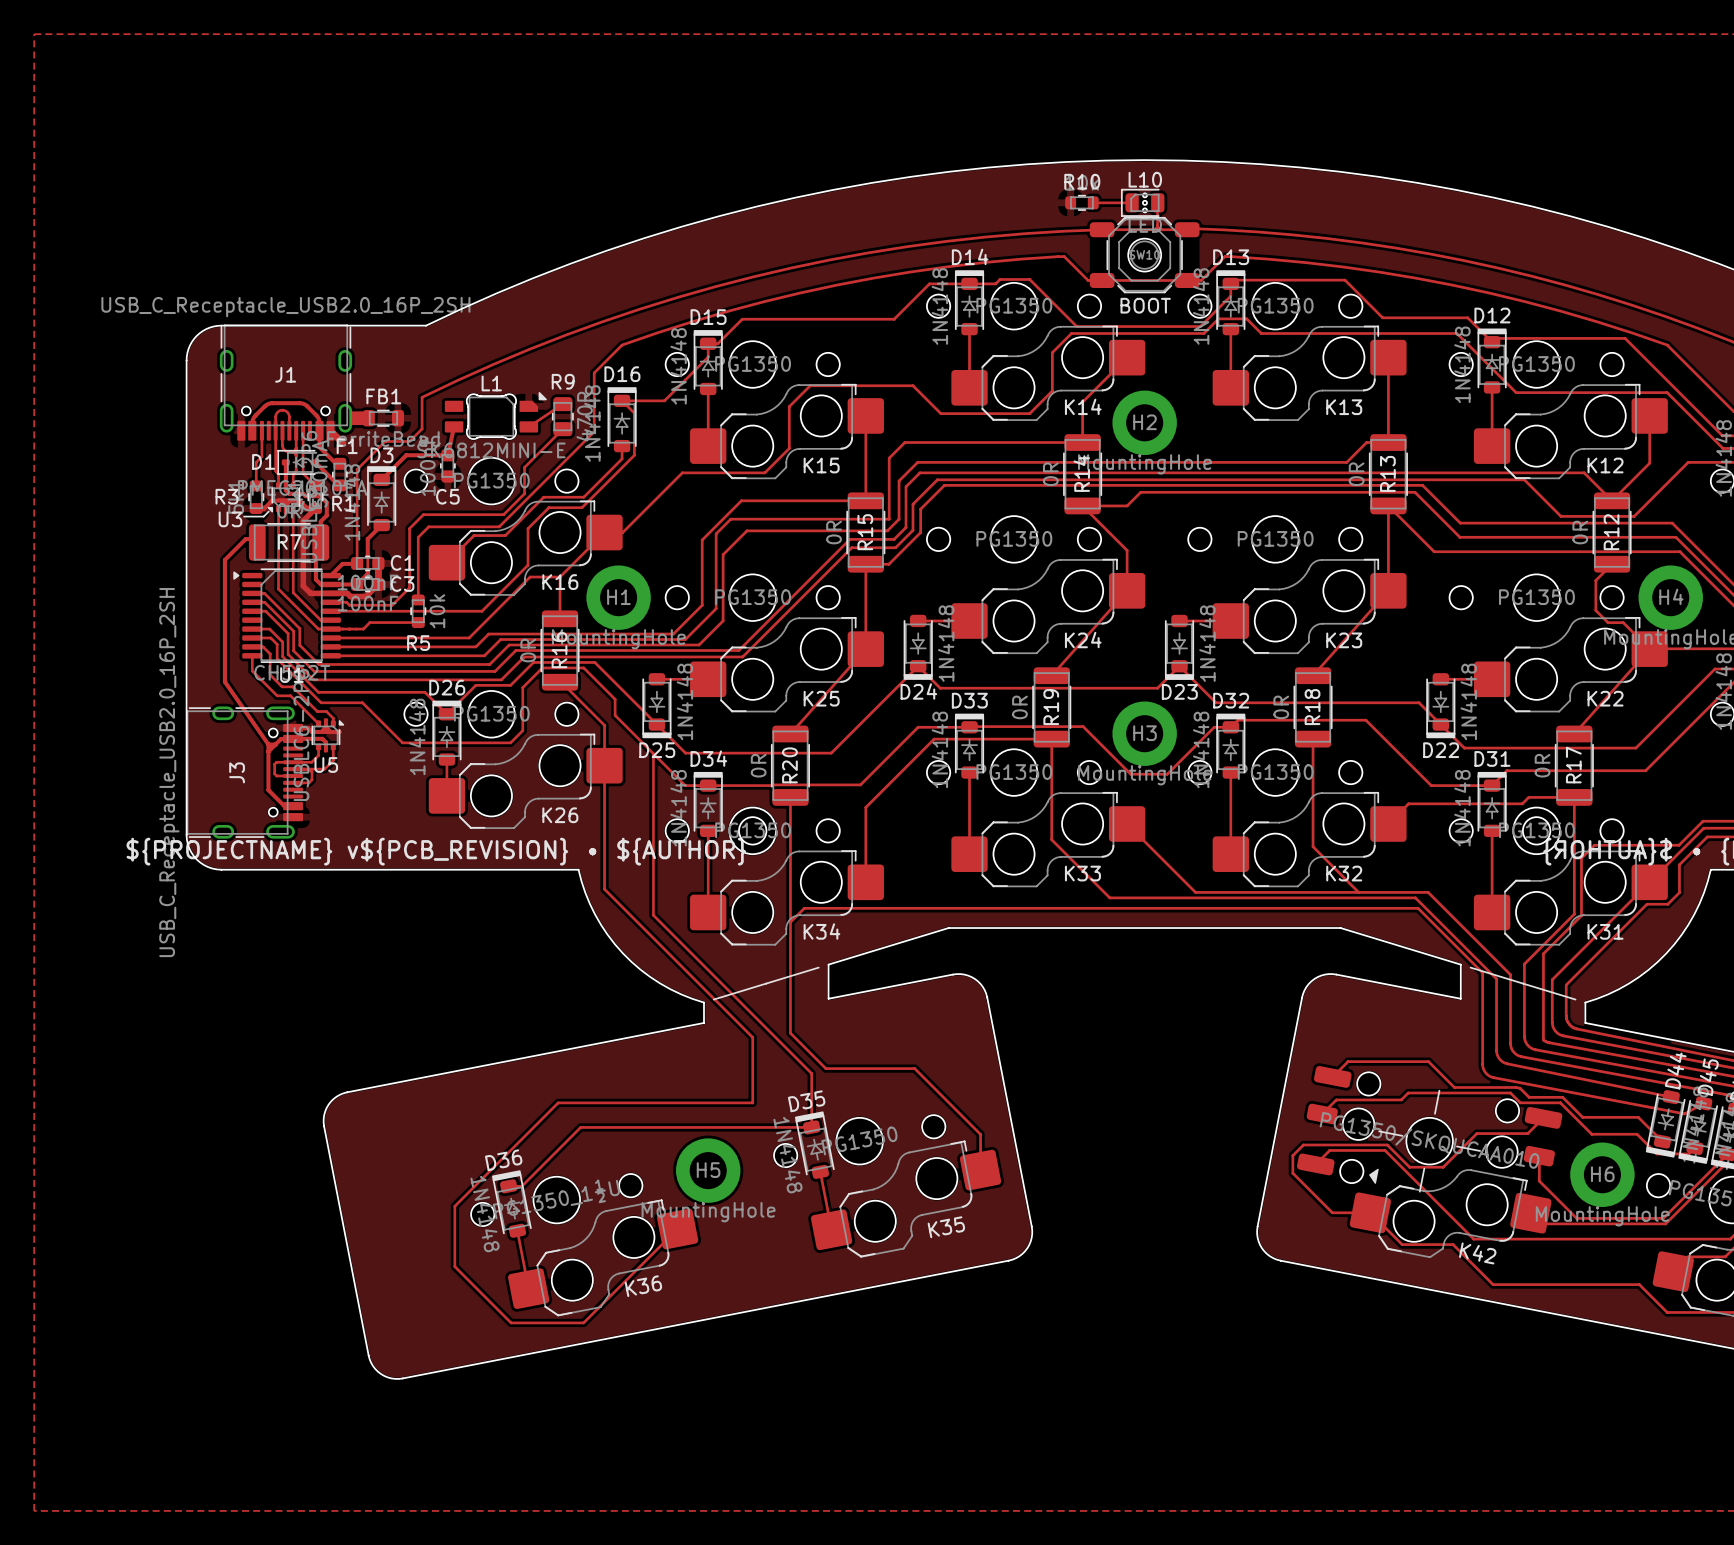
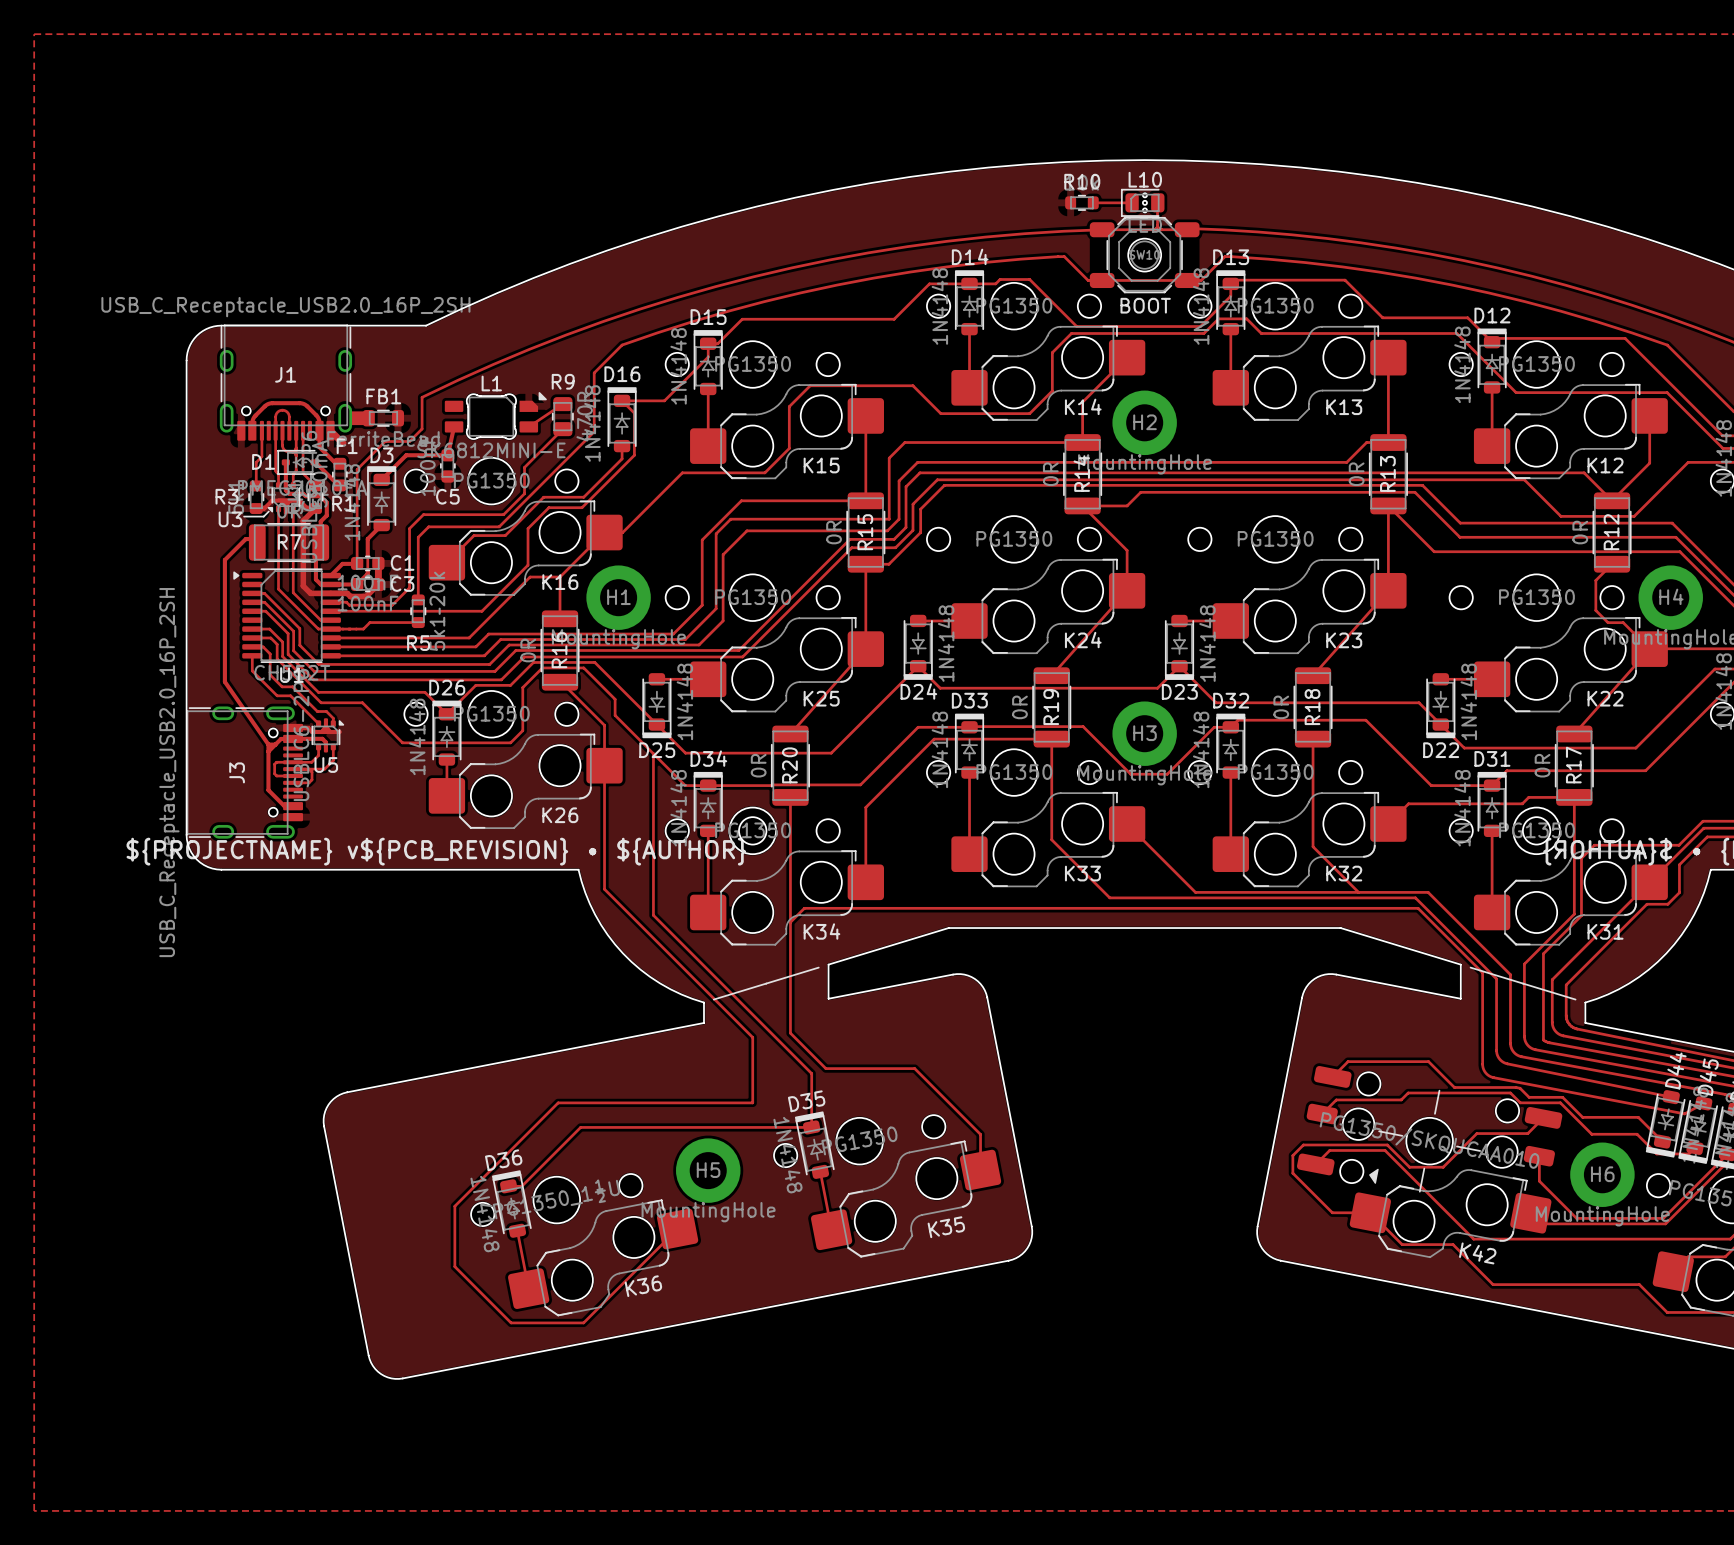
R5 value: 10k (437, 611) -> 5k1–20k (437, 611)

